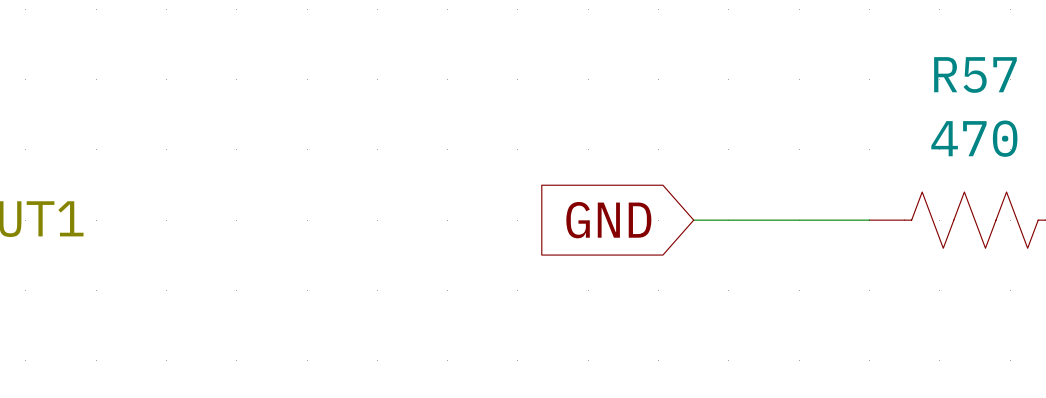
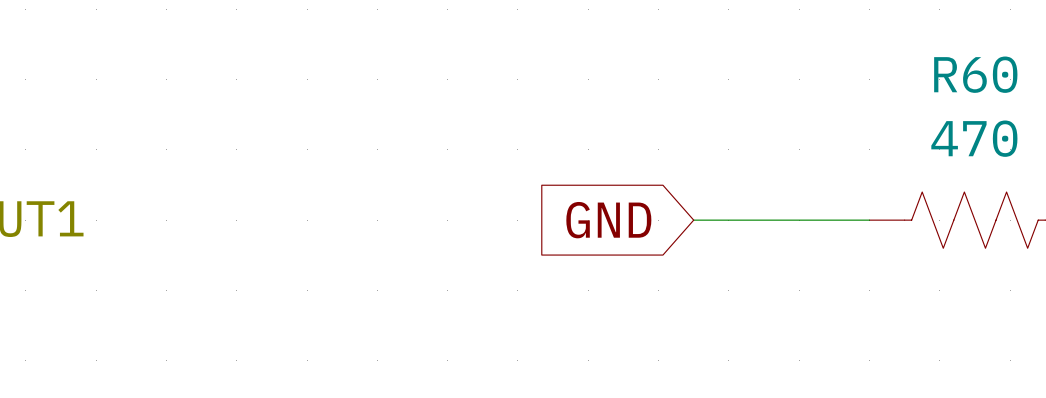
R57 name: R57 (975, 75) -> R60 (975, 74)

